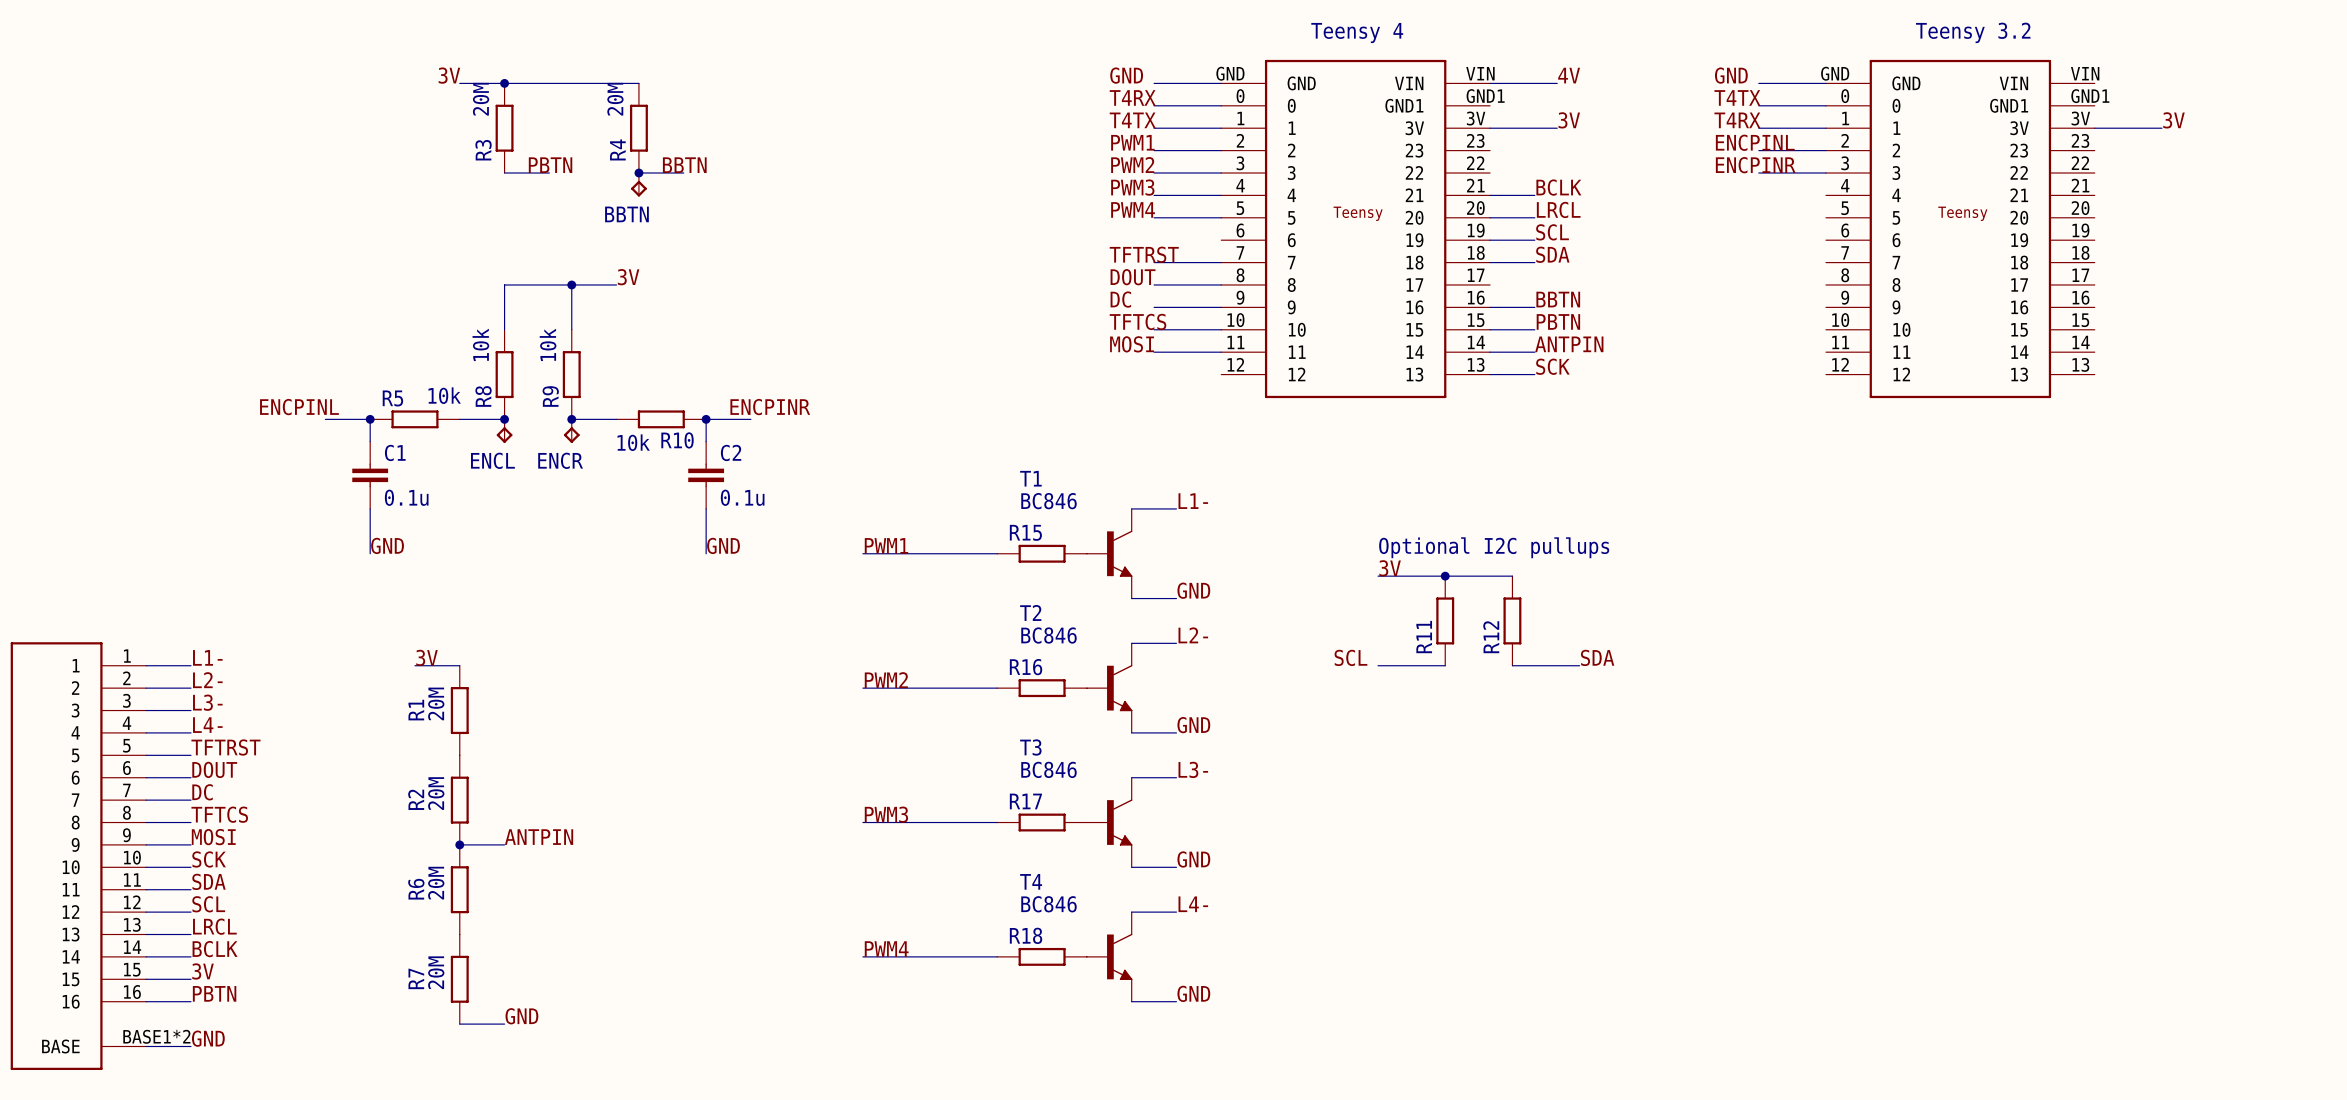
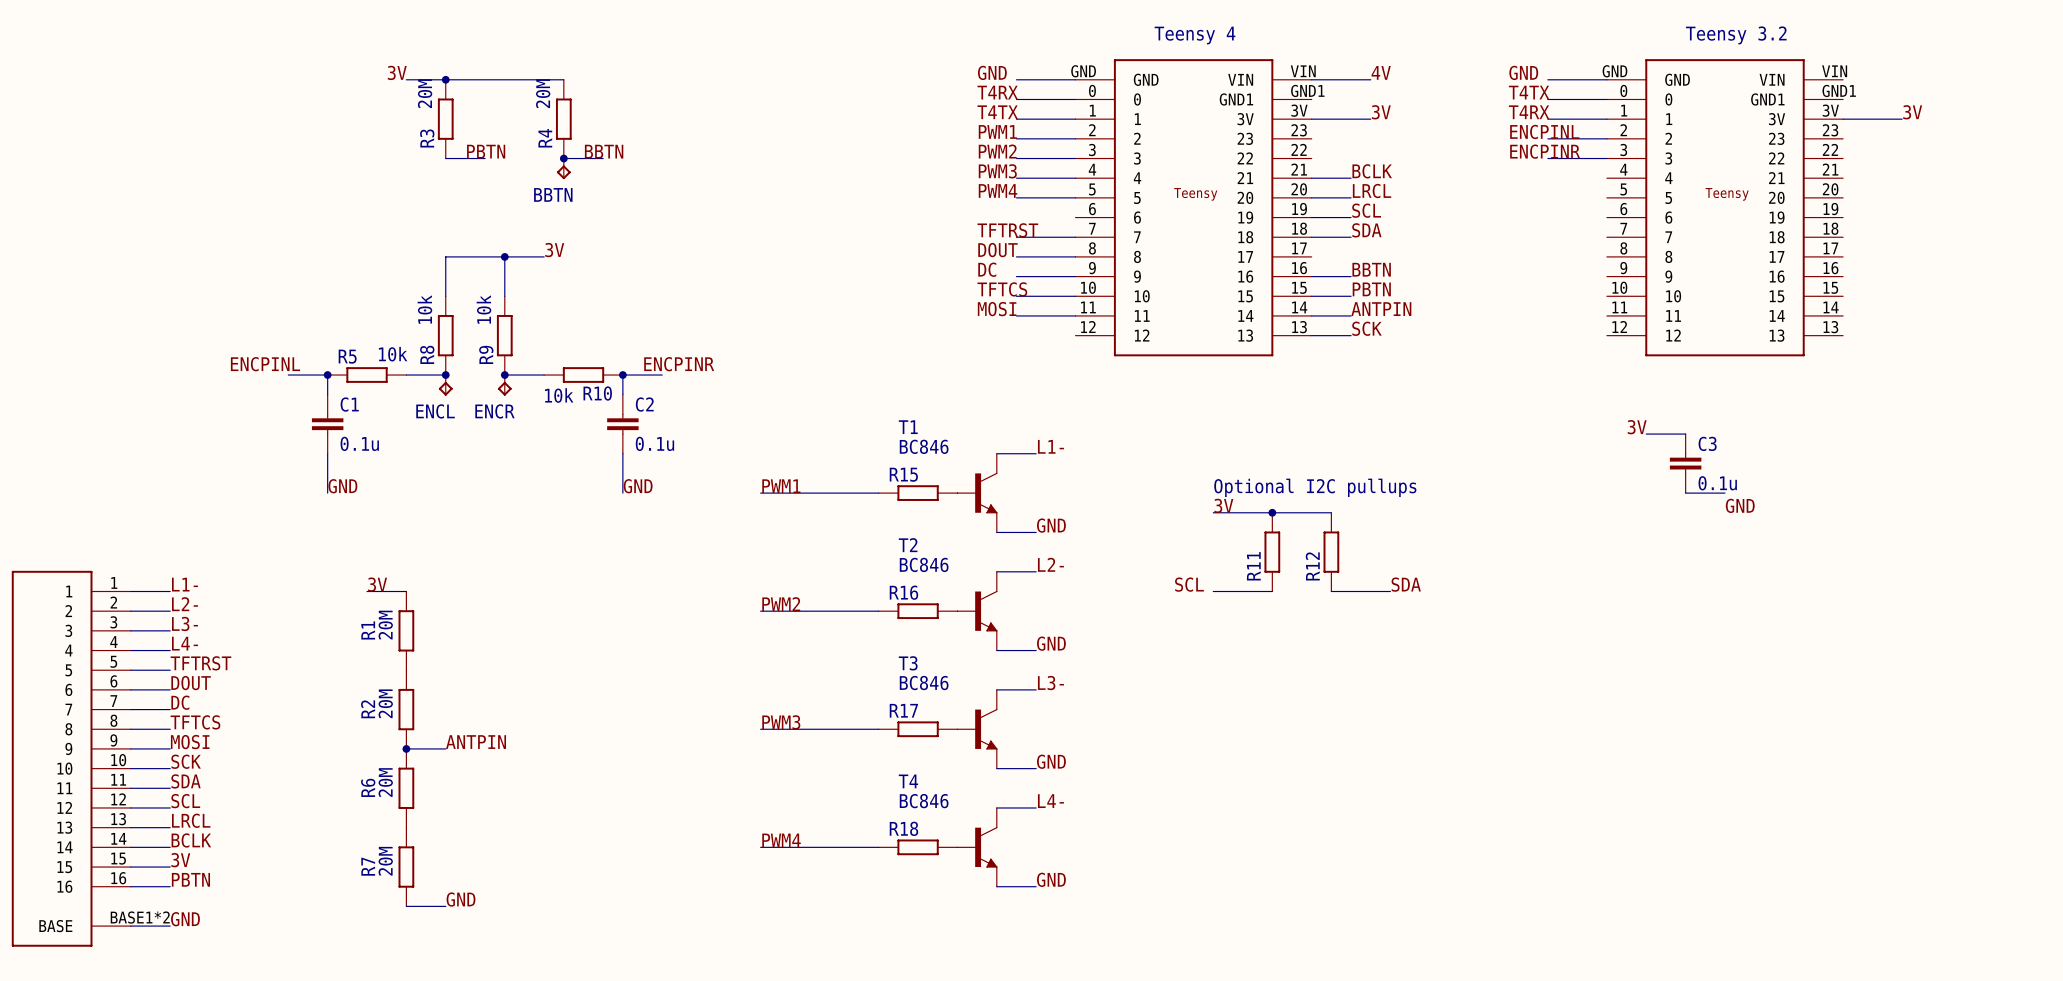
label: none -> 3V (1637, 427)
wire: none -> (1646, 434) (1685, 434)
C3: none -> 0.1u (1685, 463)
wire: none -> (1685, 493) (1725, 493)
label: none -> GND (1740, 505)

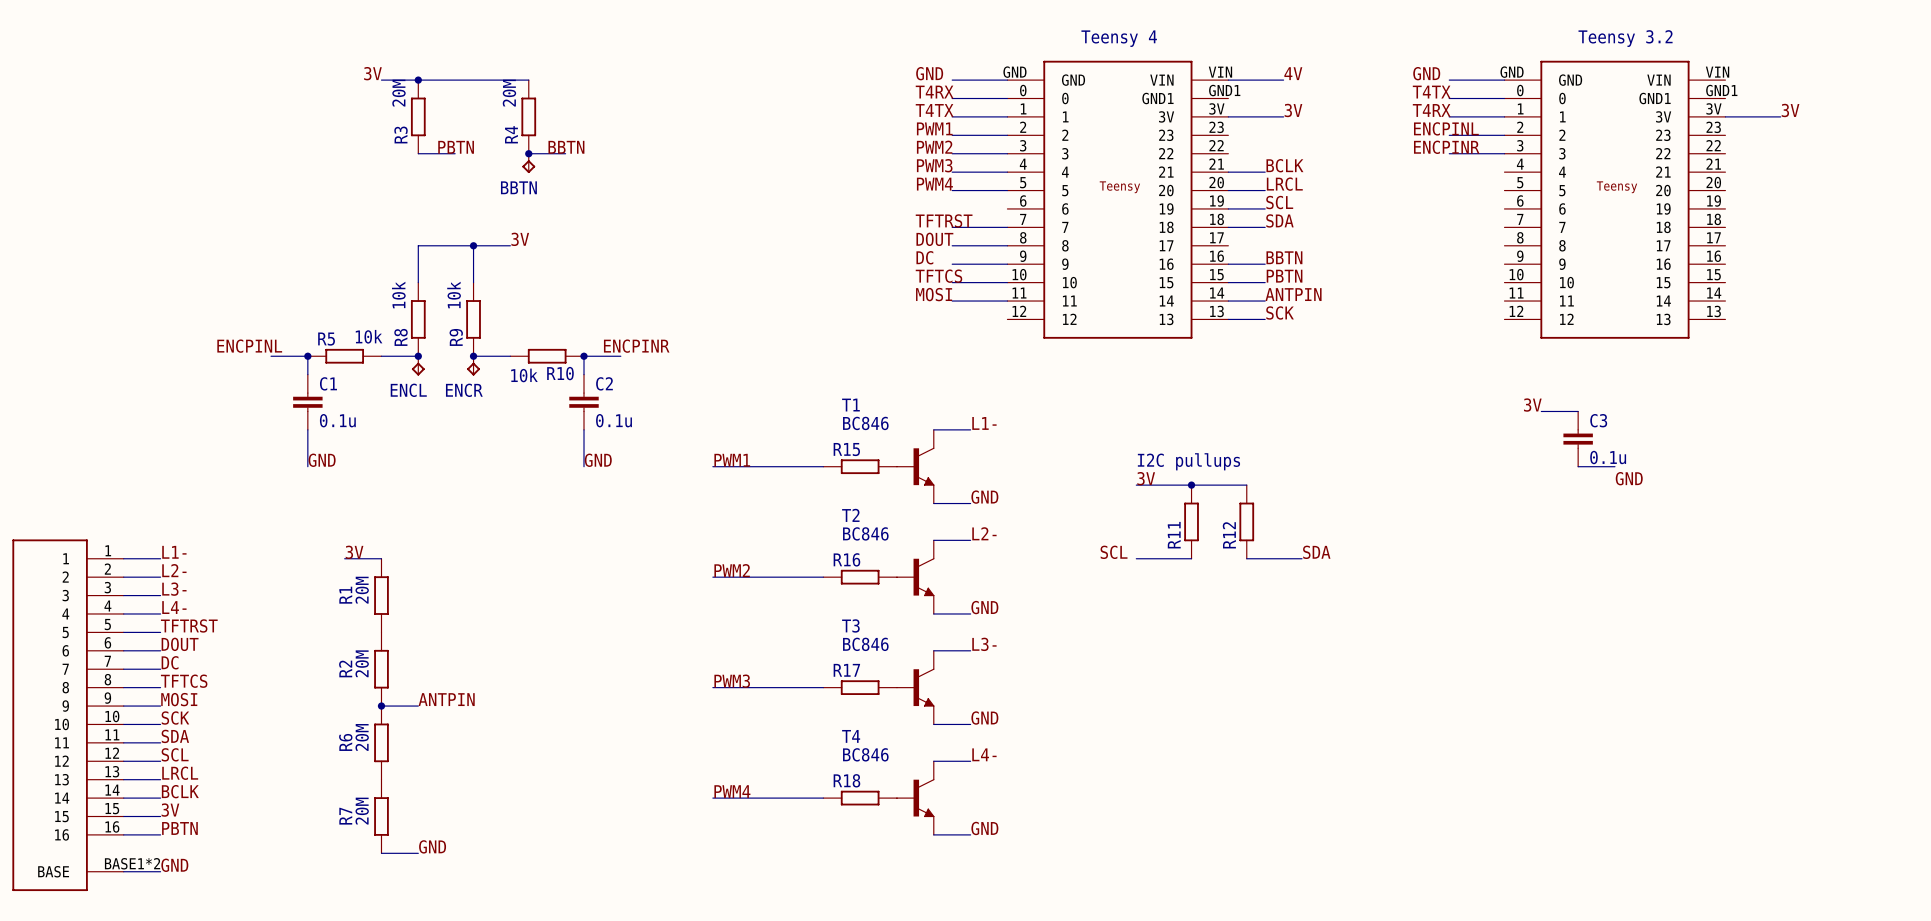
text: Optional I2C pullups (1315, 487) -> I2C pullups (1188, 461)

